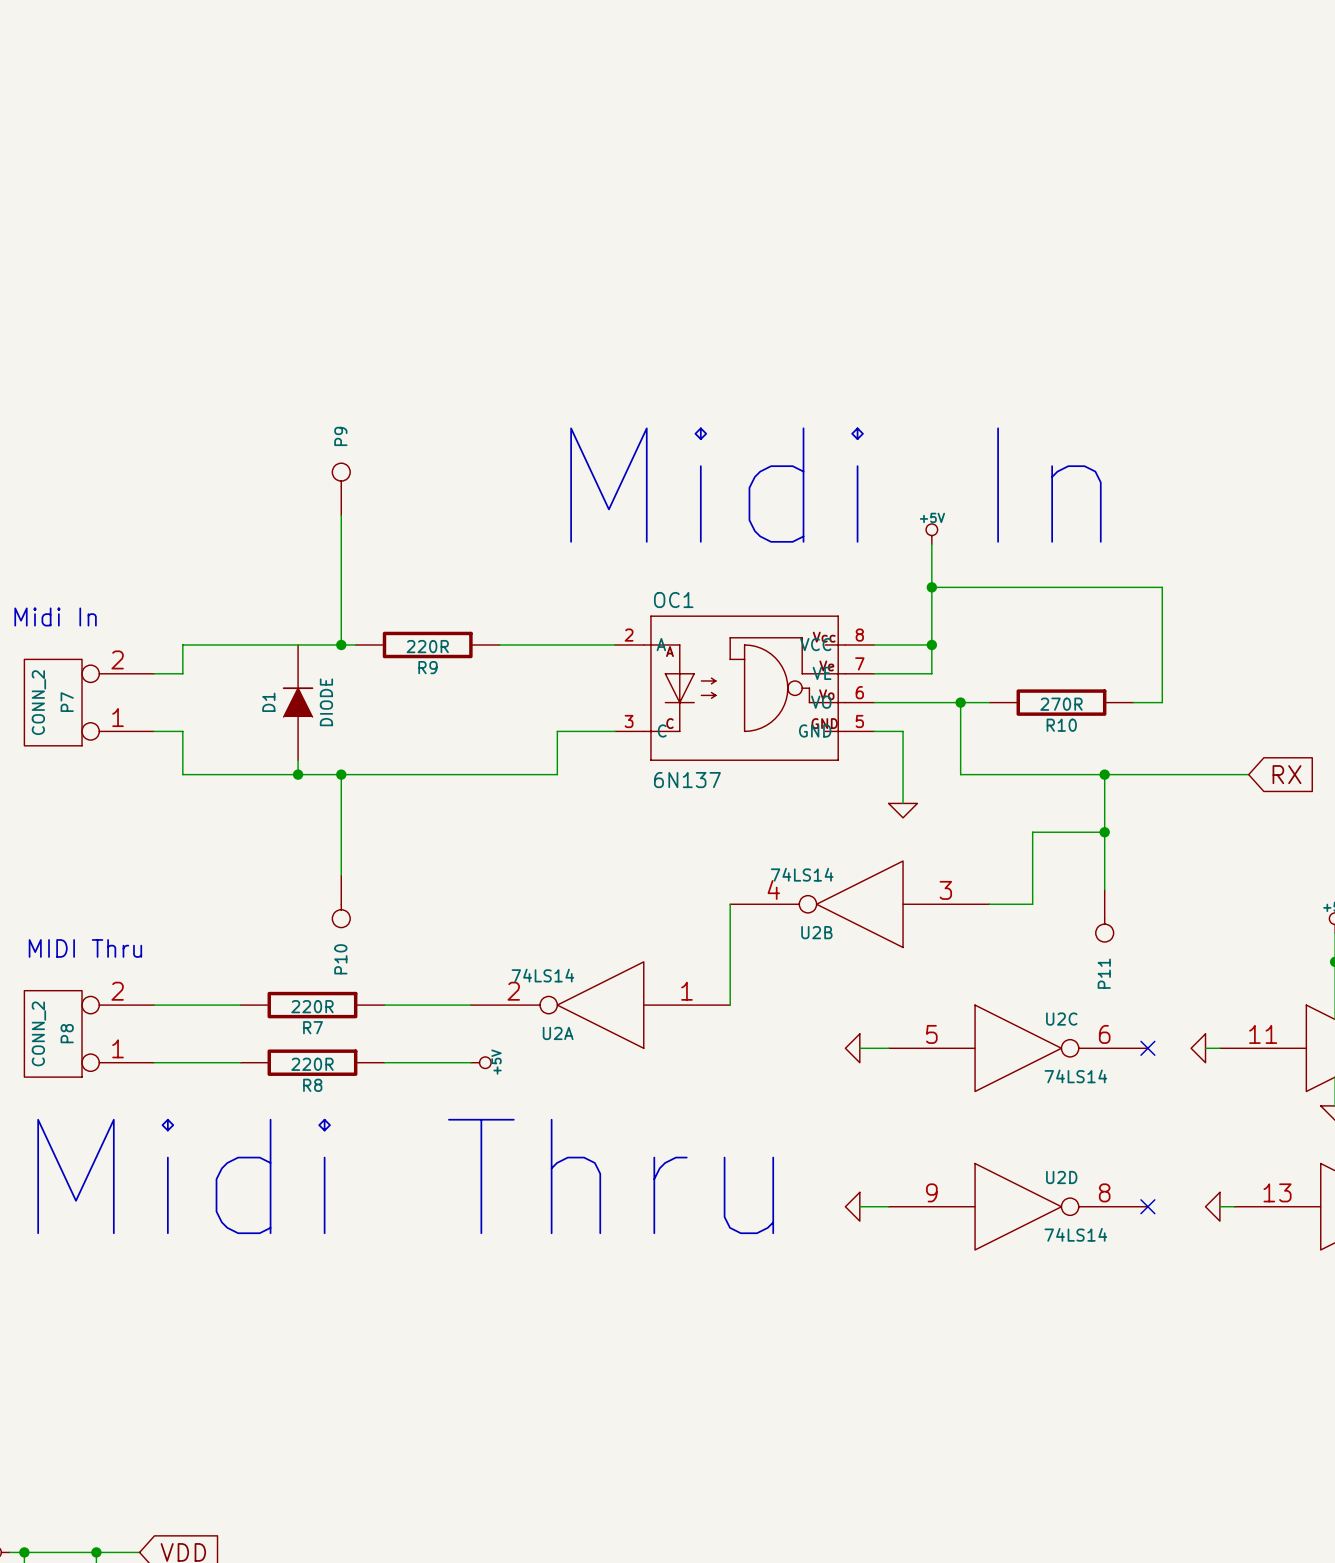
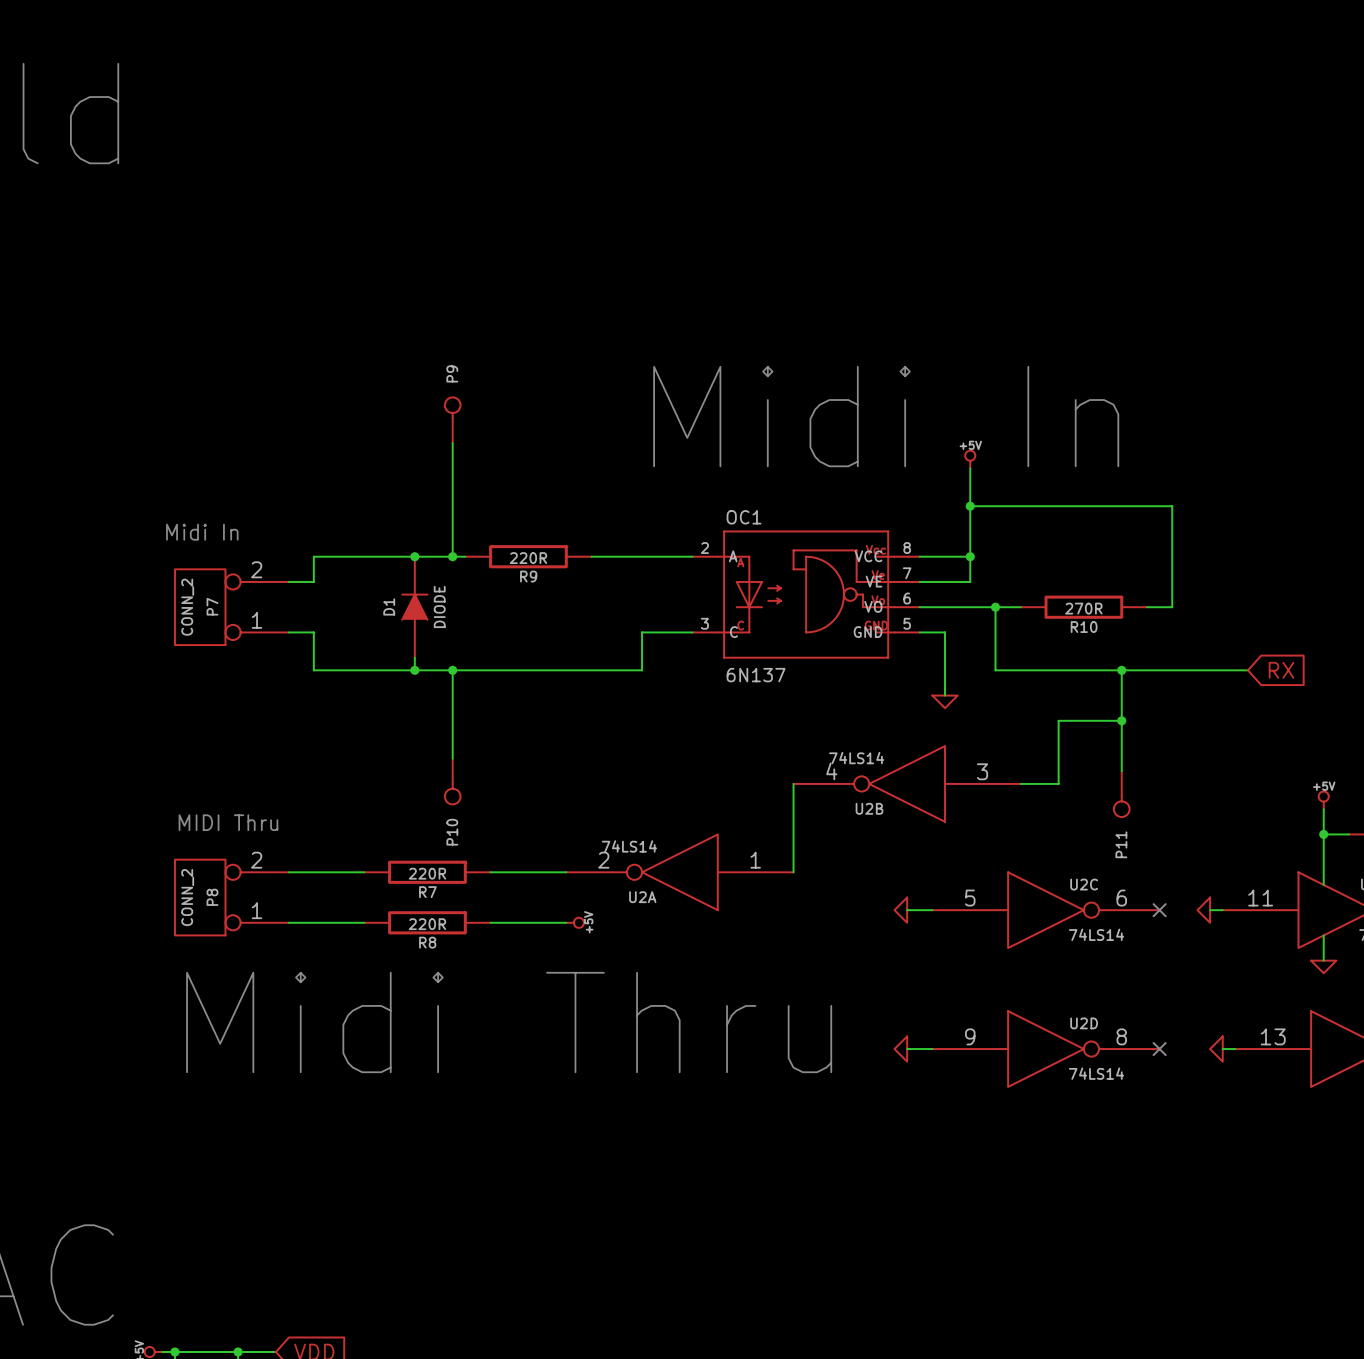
junction: none -> (414, 556)

